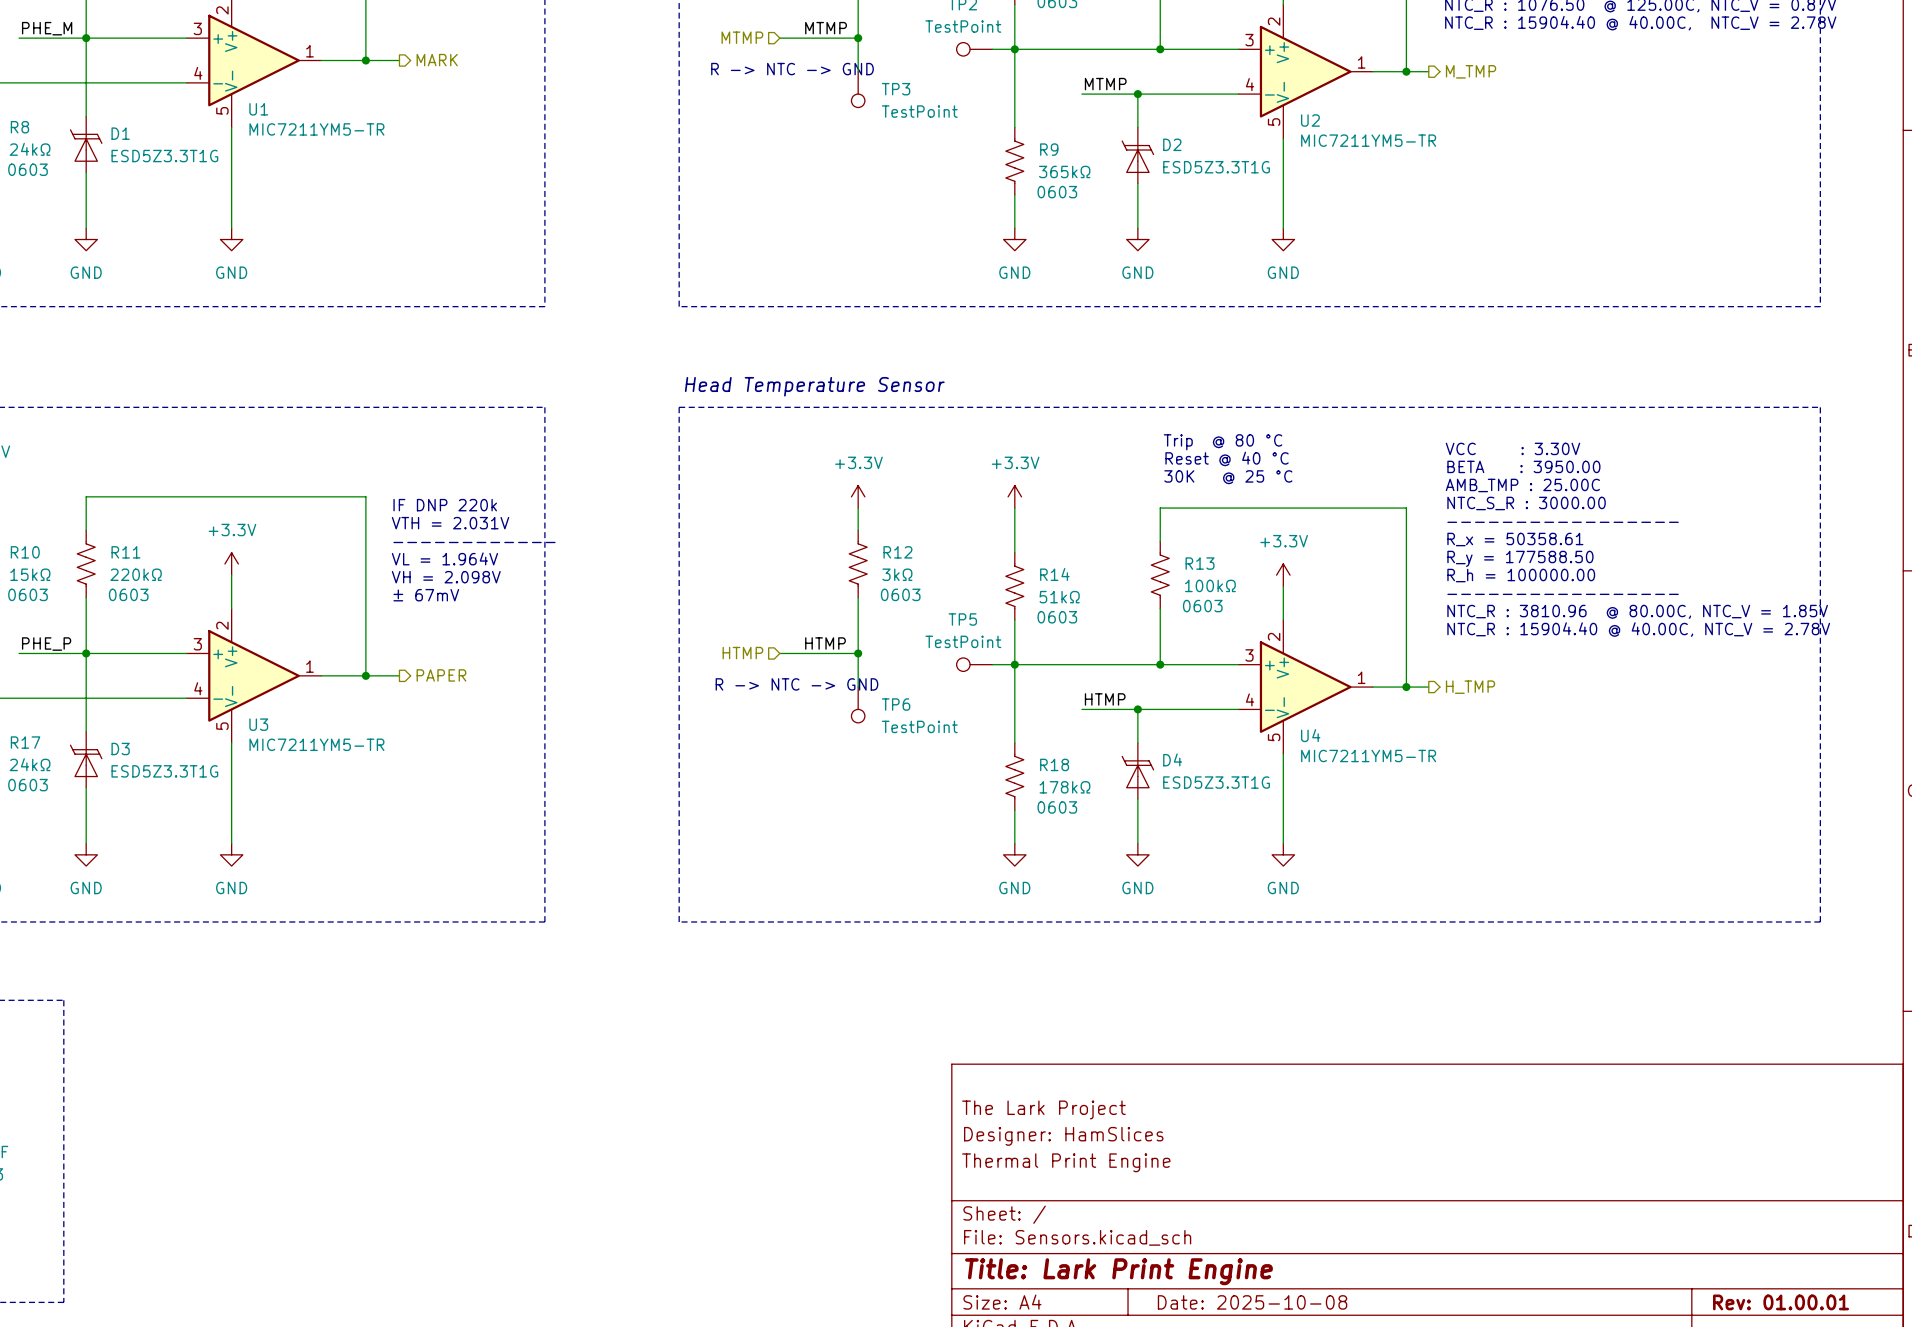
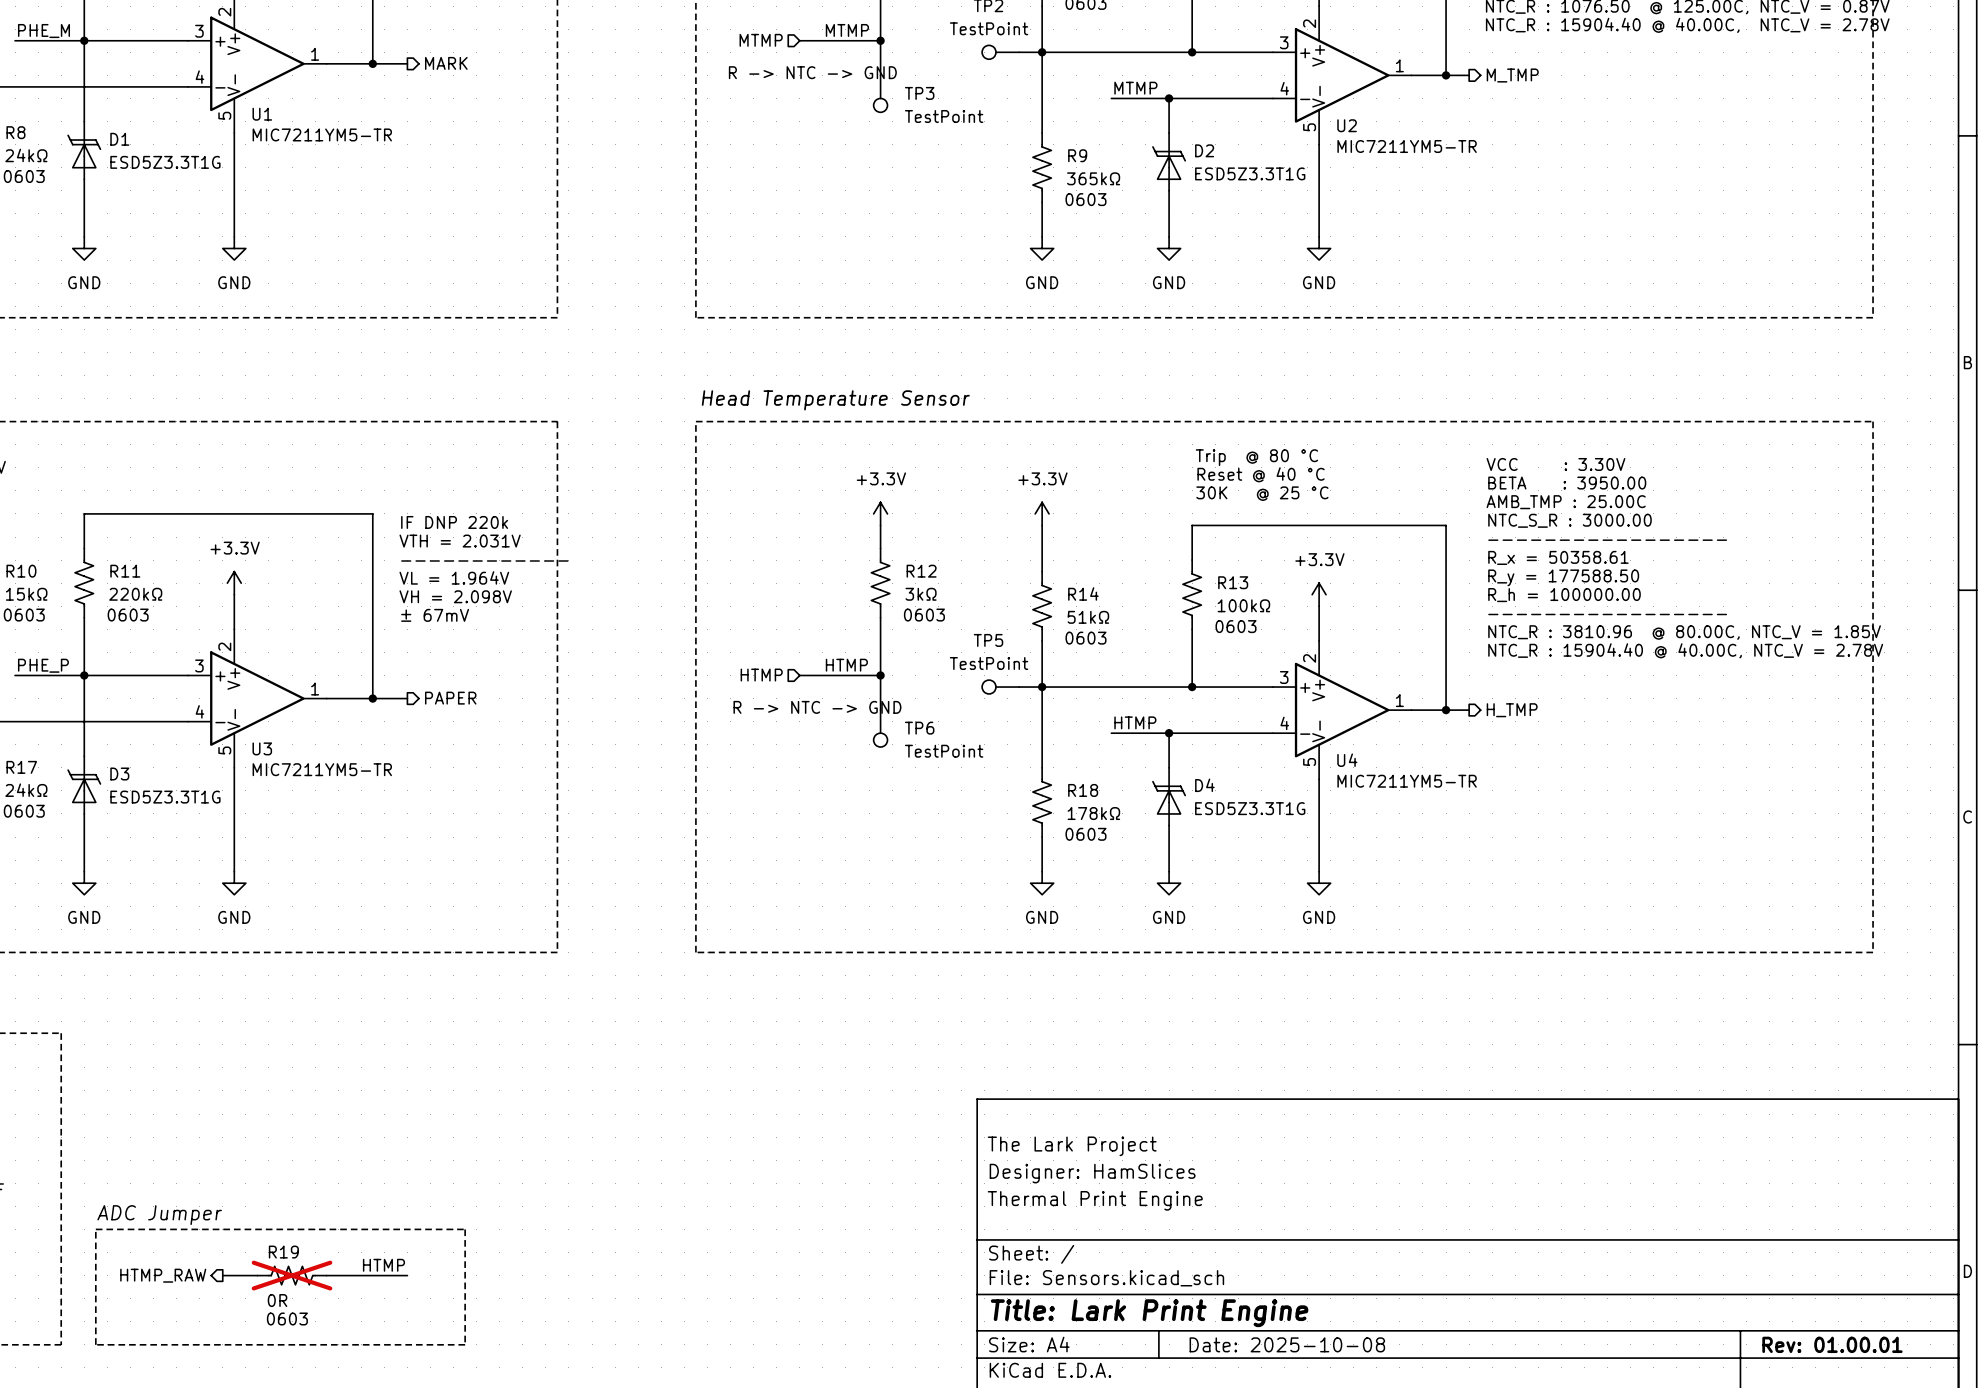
text: none -> ADC Jumper (159, 1215)
line: none -> (95, 1229) (465, 1229) (465, 1344) (95, 1344) (95, 1229)
label: none -> HTMP (383, 1265)
hierarchical label: none -> HTMP_RAW (163, 1275)
wire: none -> (222, 1275) (257, 1275)
R19: none -> 0R (292, 1275)
wire: none -> (326, 1275) (407, 1275)

